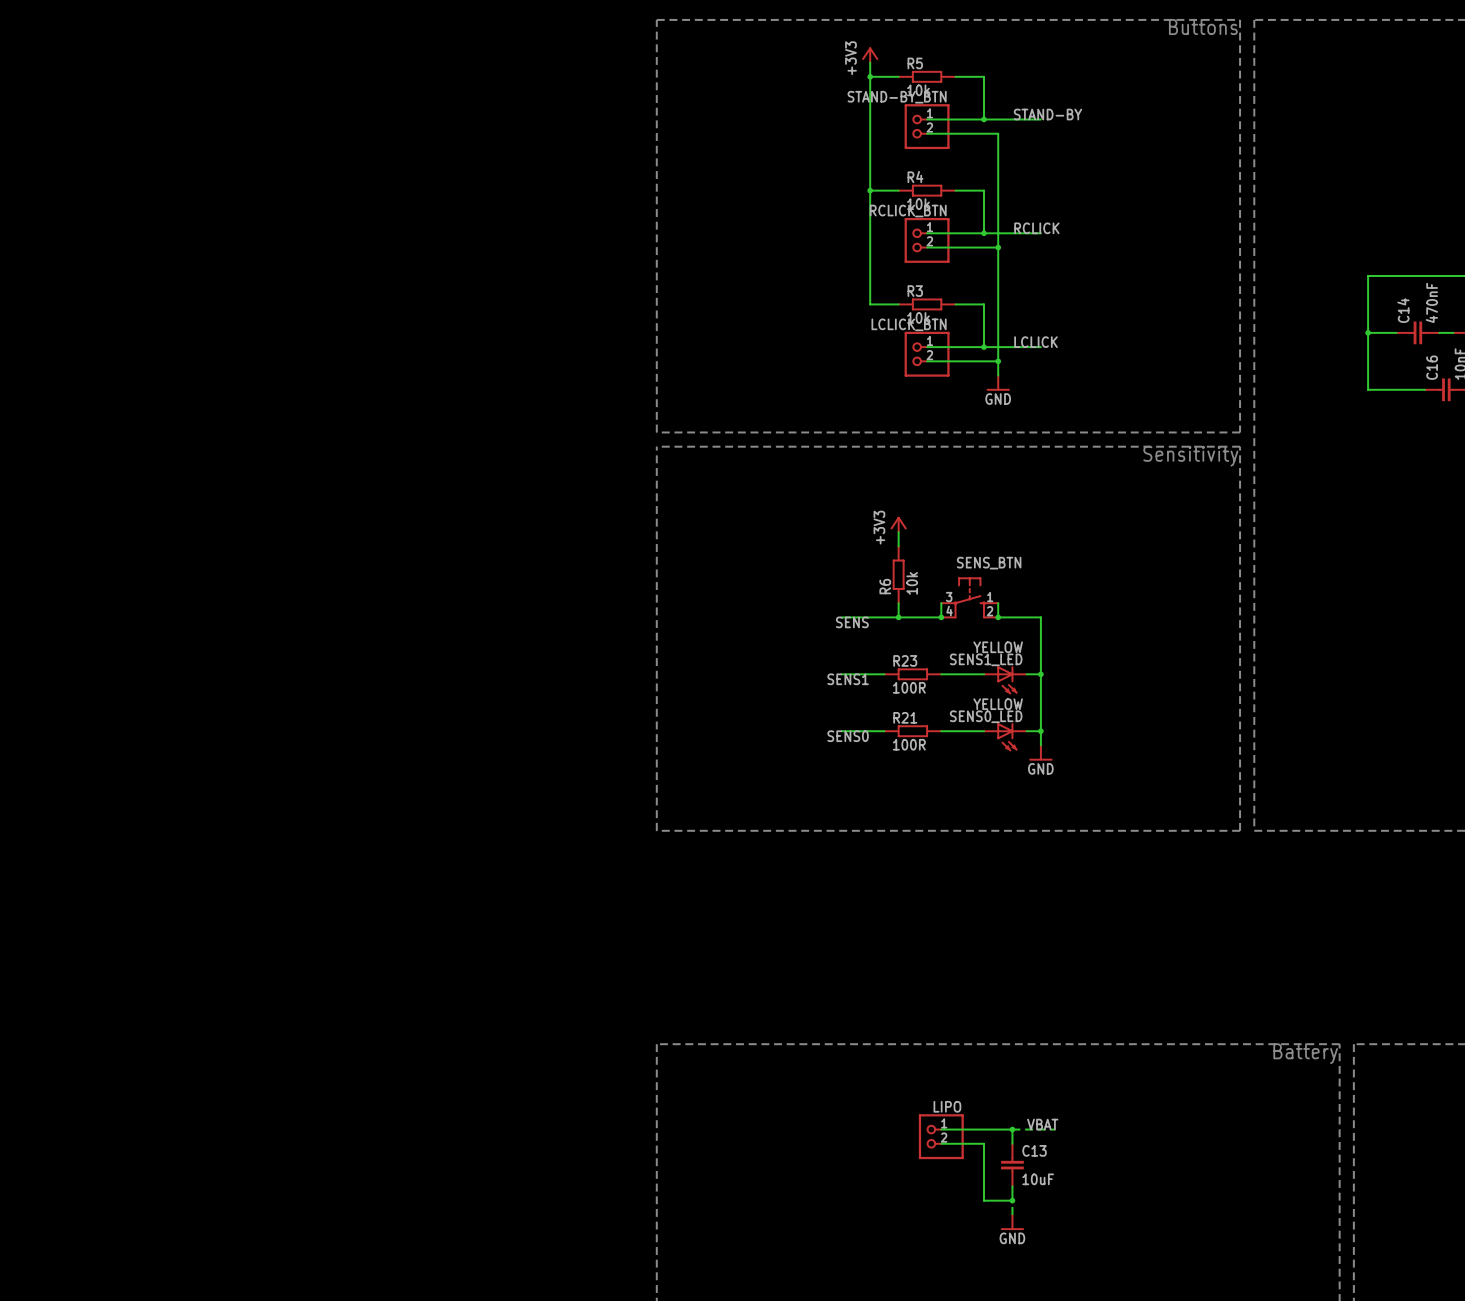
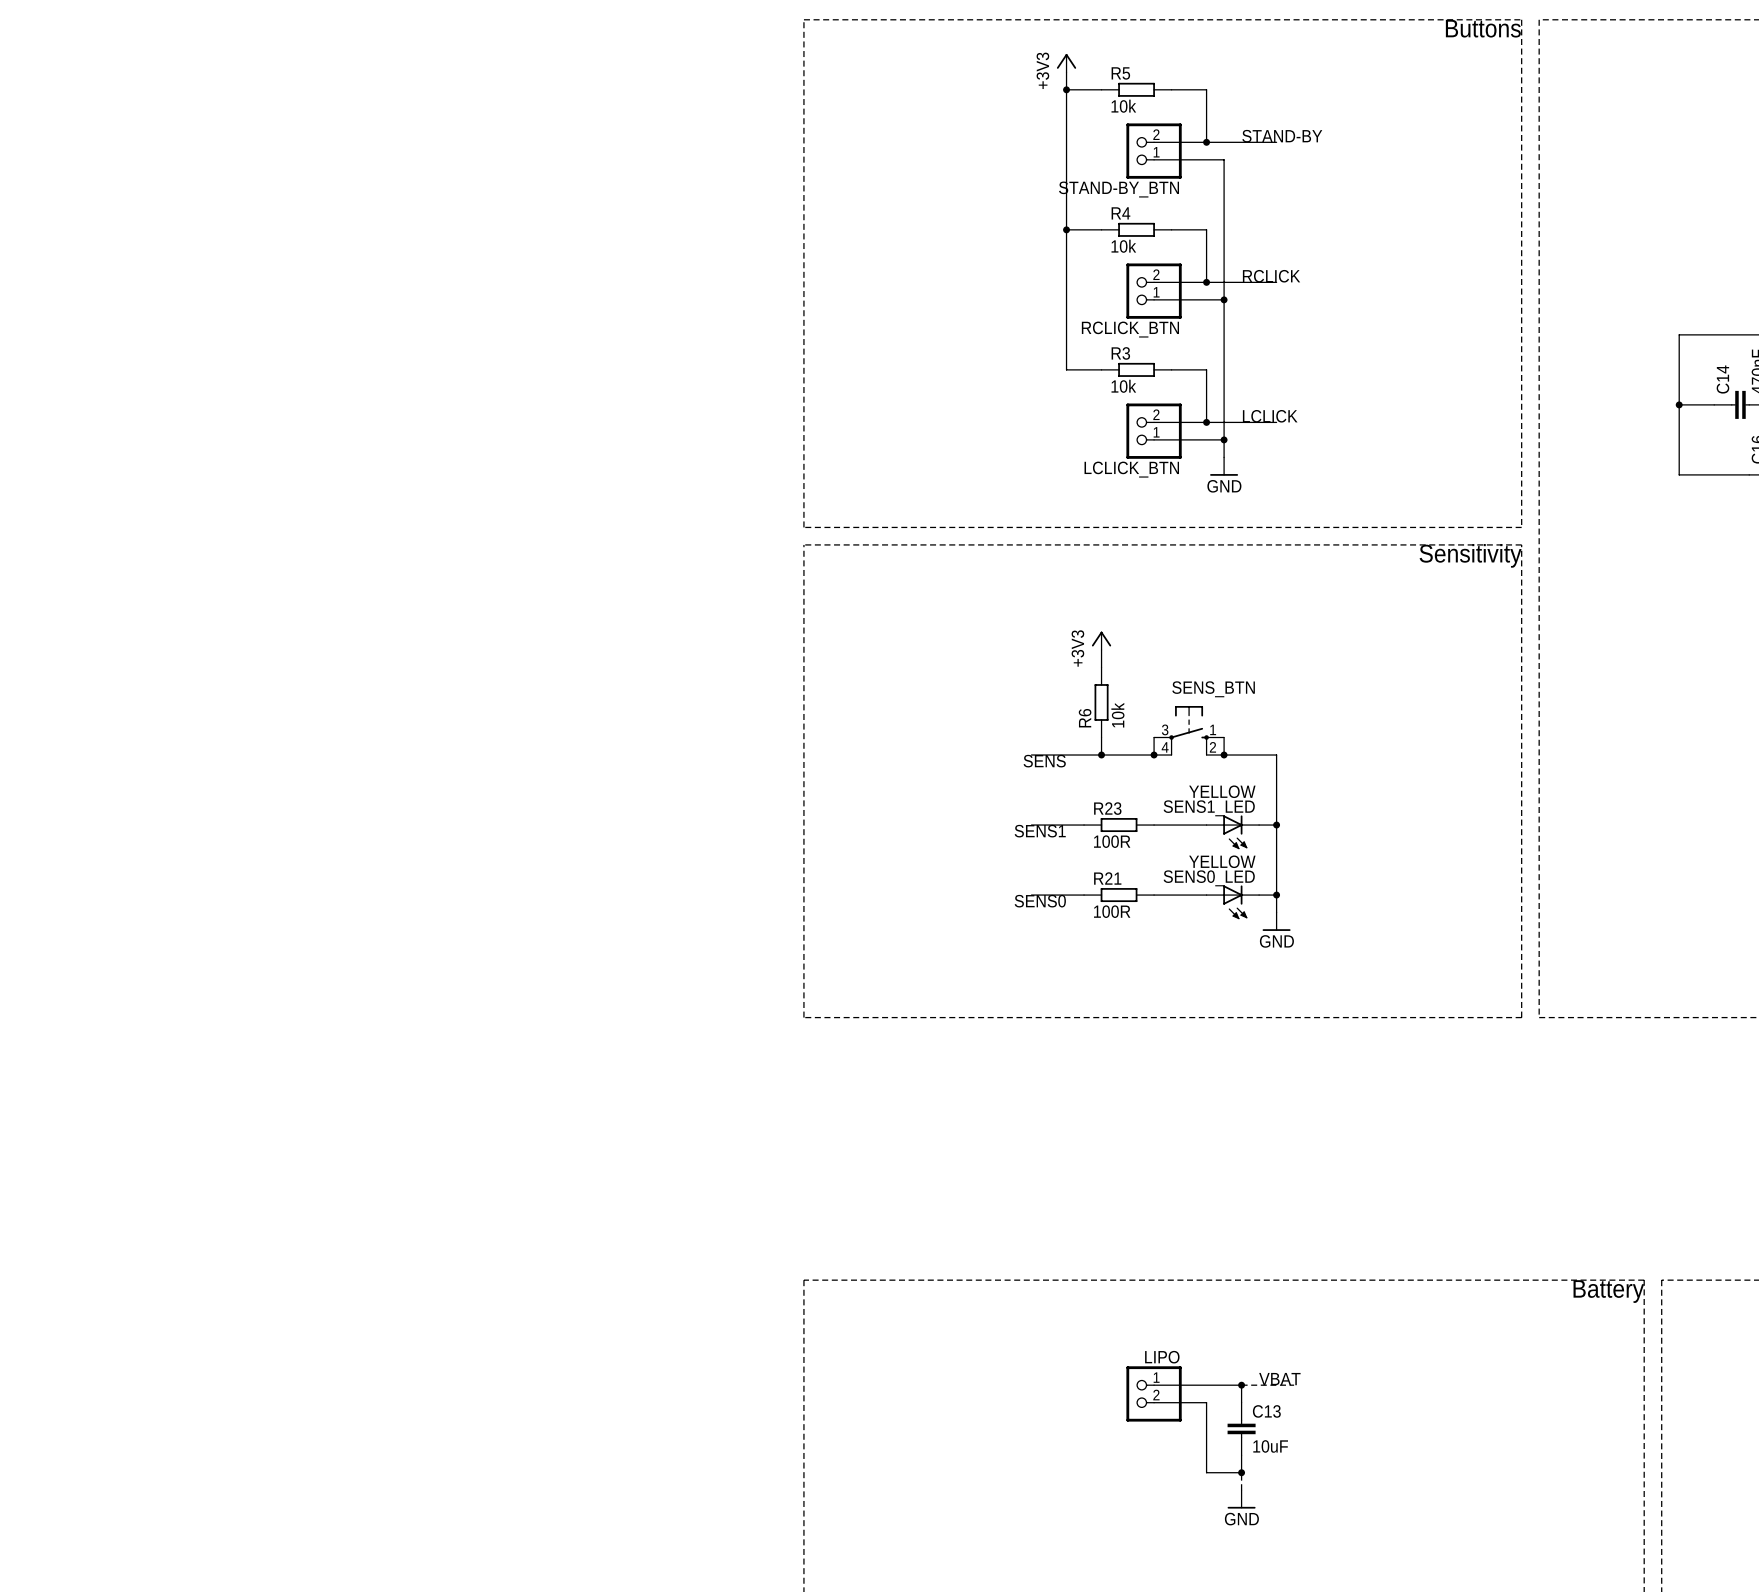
STAND-BY_BTN: (927, 126) -> none
STAND-BY_BTN: none -> (1154, 151)
RCLICK_BTN: (927, 240) -> none
RCLICK_BTN: none -> (1154, 291)
LCLICK_BTN: (927, 354) -> none
LCLICK_BTN: none -> (1154, 431)

